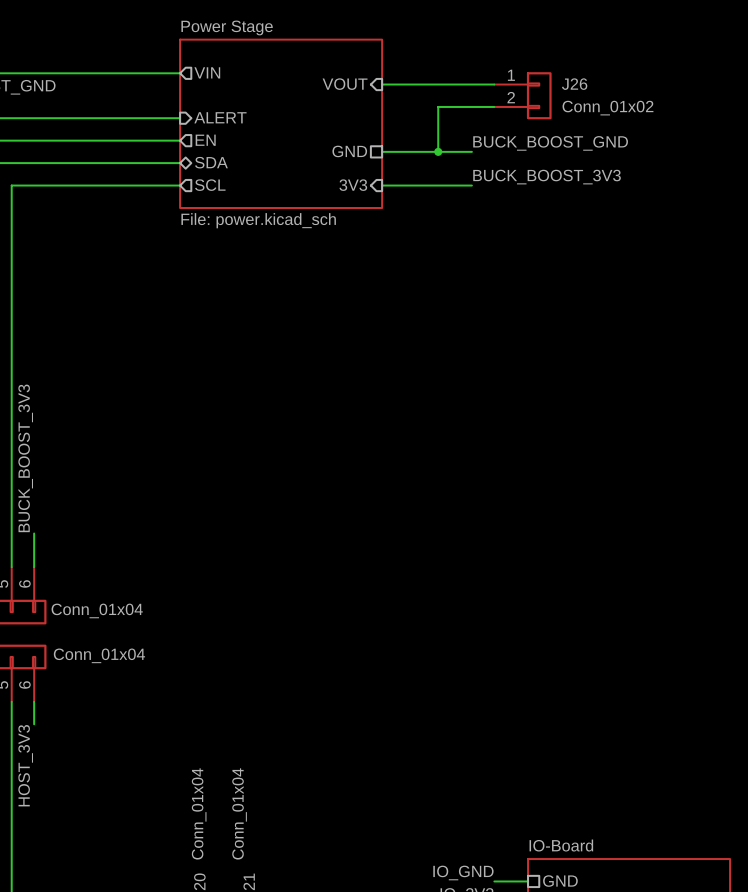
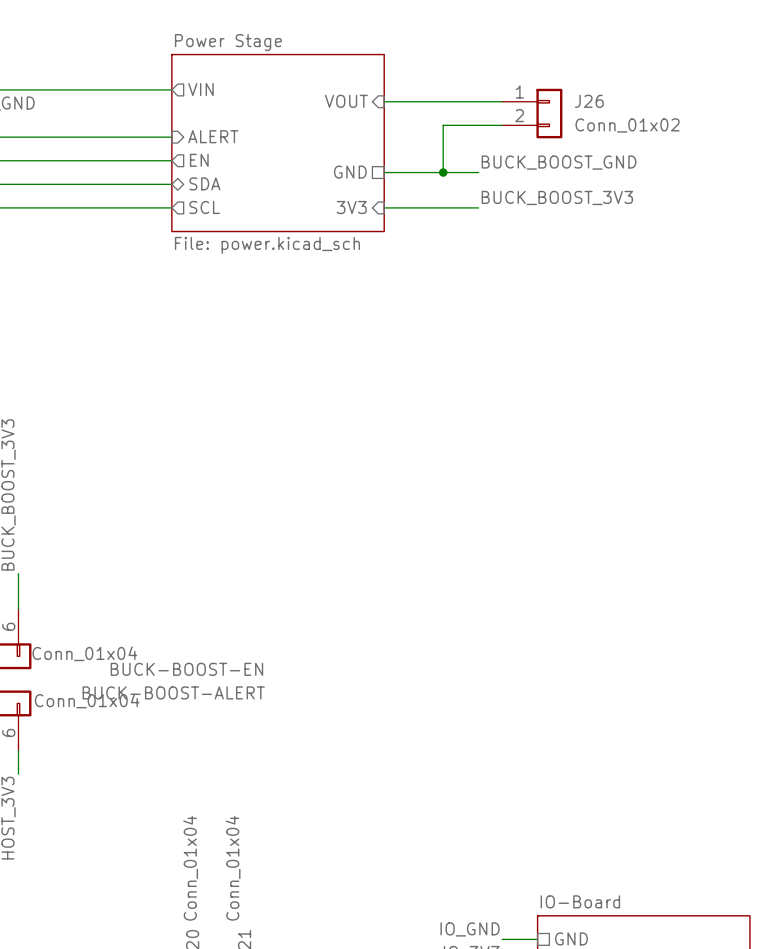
label: none -> BUCK-BOOST-EN (186, 669)
label: none -> BUCK-BOOST-ALERT (173, 692)

